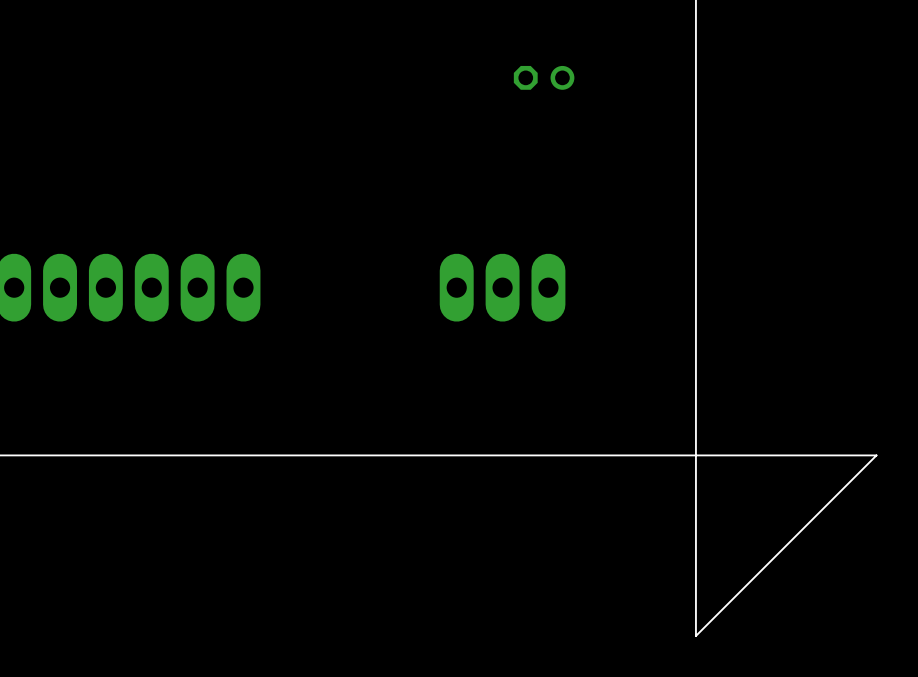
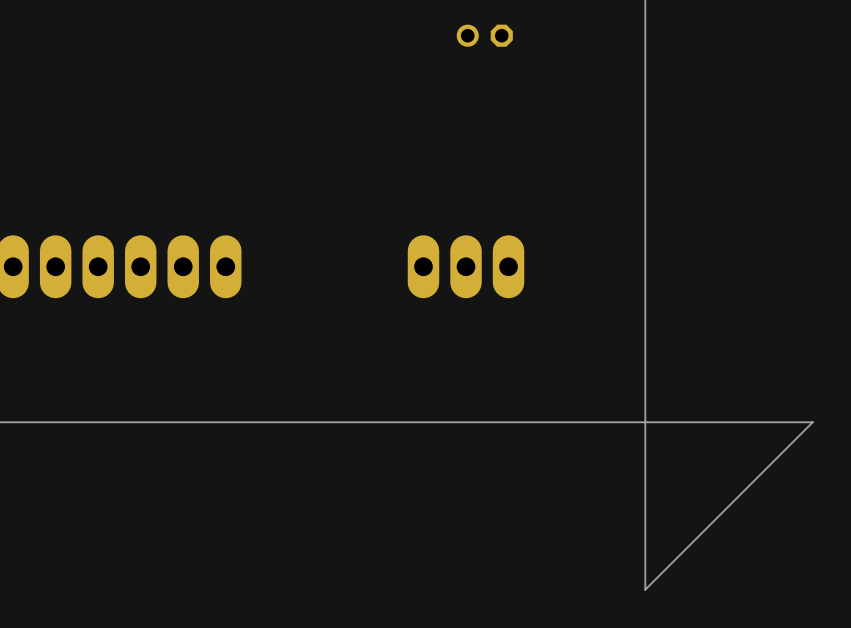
part rotation: 0° (544, 77) -> 180° (484, 35)
part position: (544, 77) -> (484, 35)

